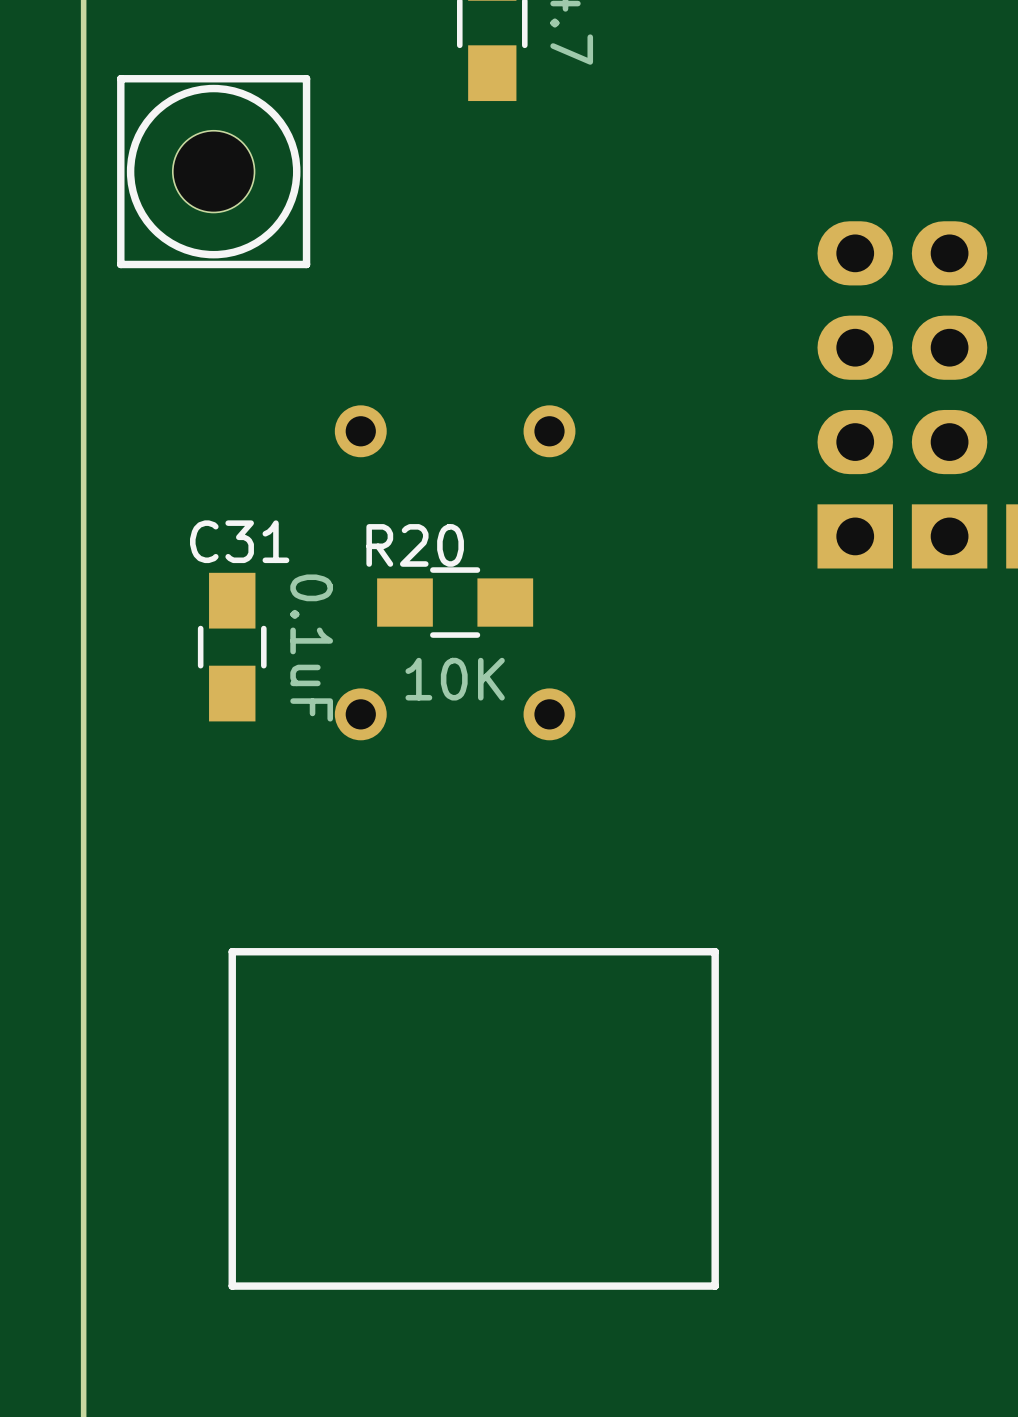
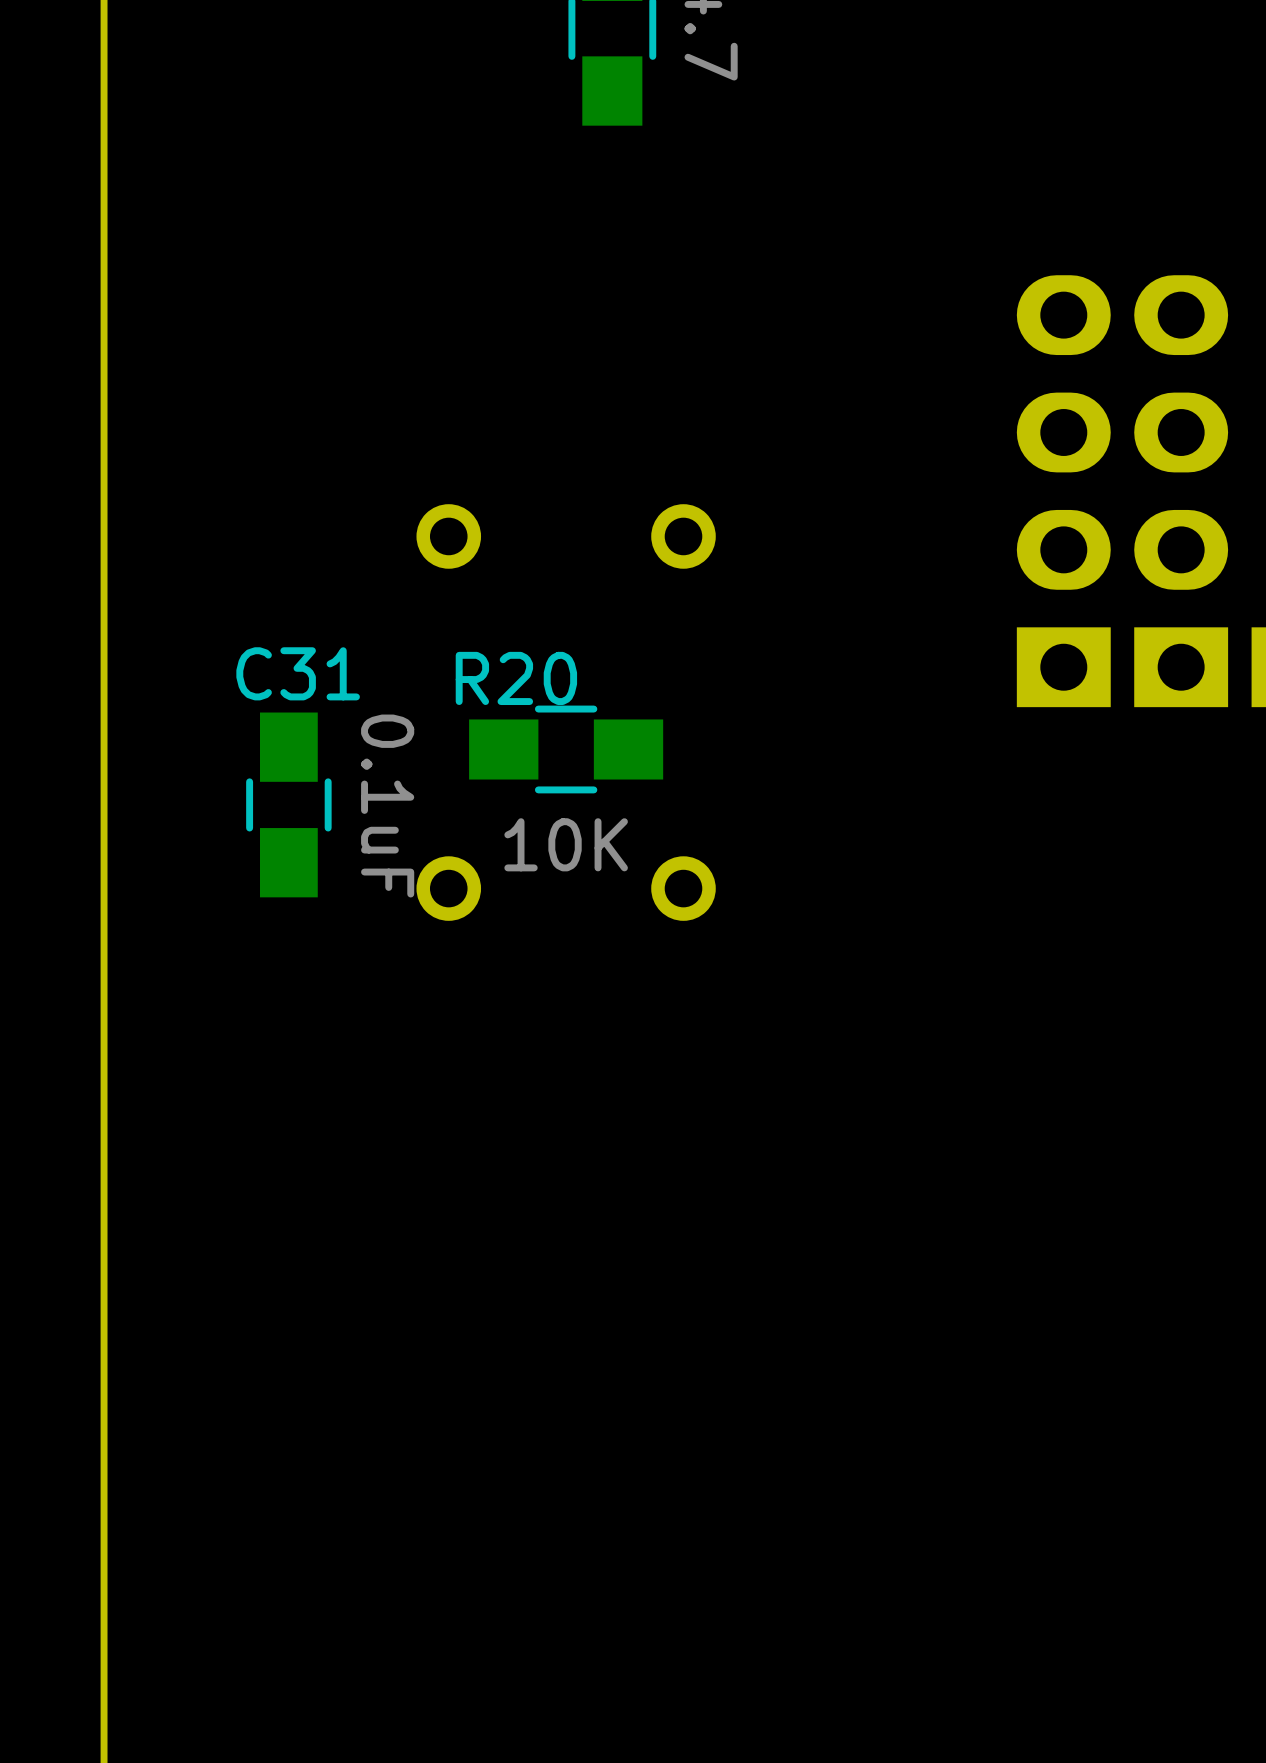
line: (306, 78) (306, 264) (120, 264) (120, 78) (306, 78) -> none
drawing: [126, 84, 301, 259] -> none
part: (213, 171) -> none
line: (715, 951) (715, 1286) (232, 1286) (232, 951) (715, 951) -> none

